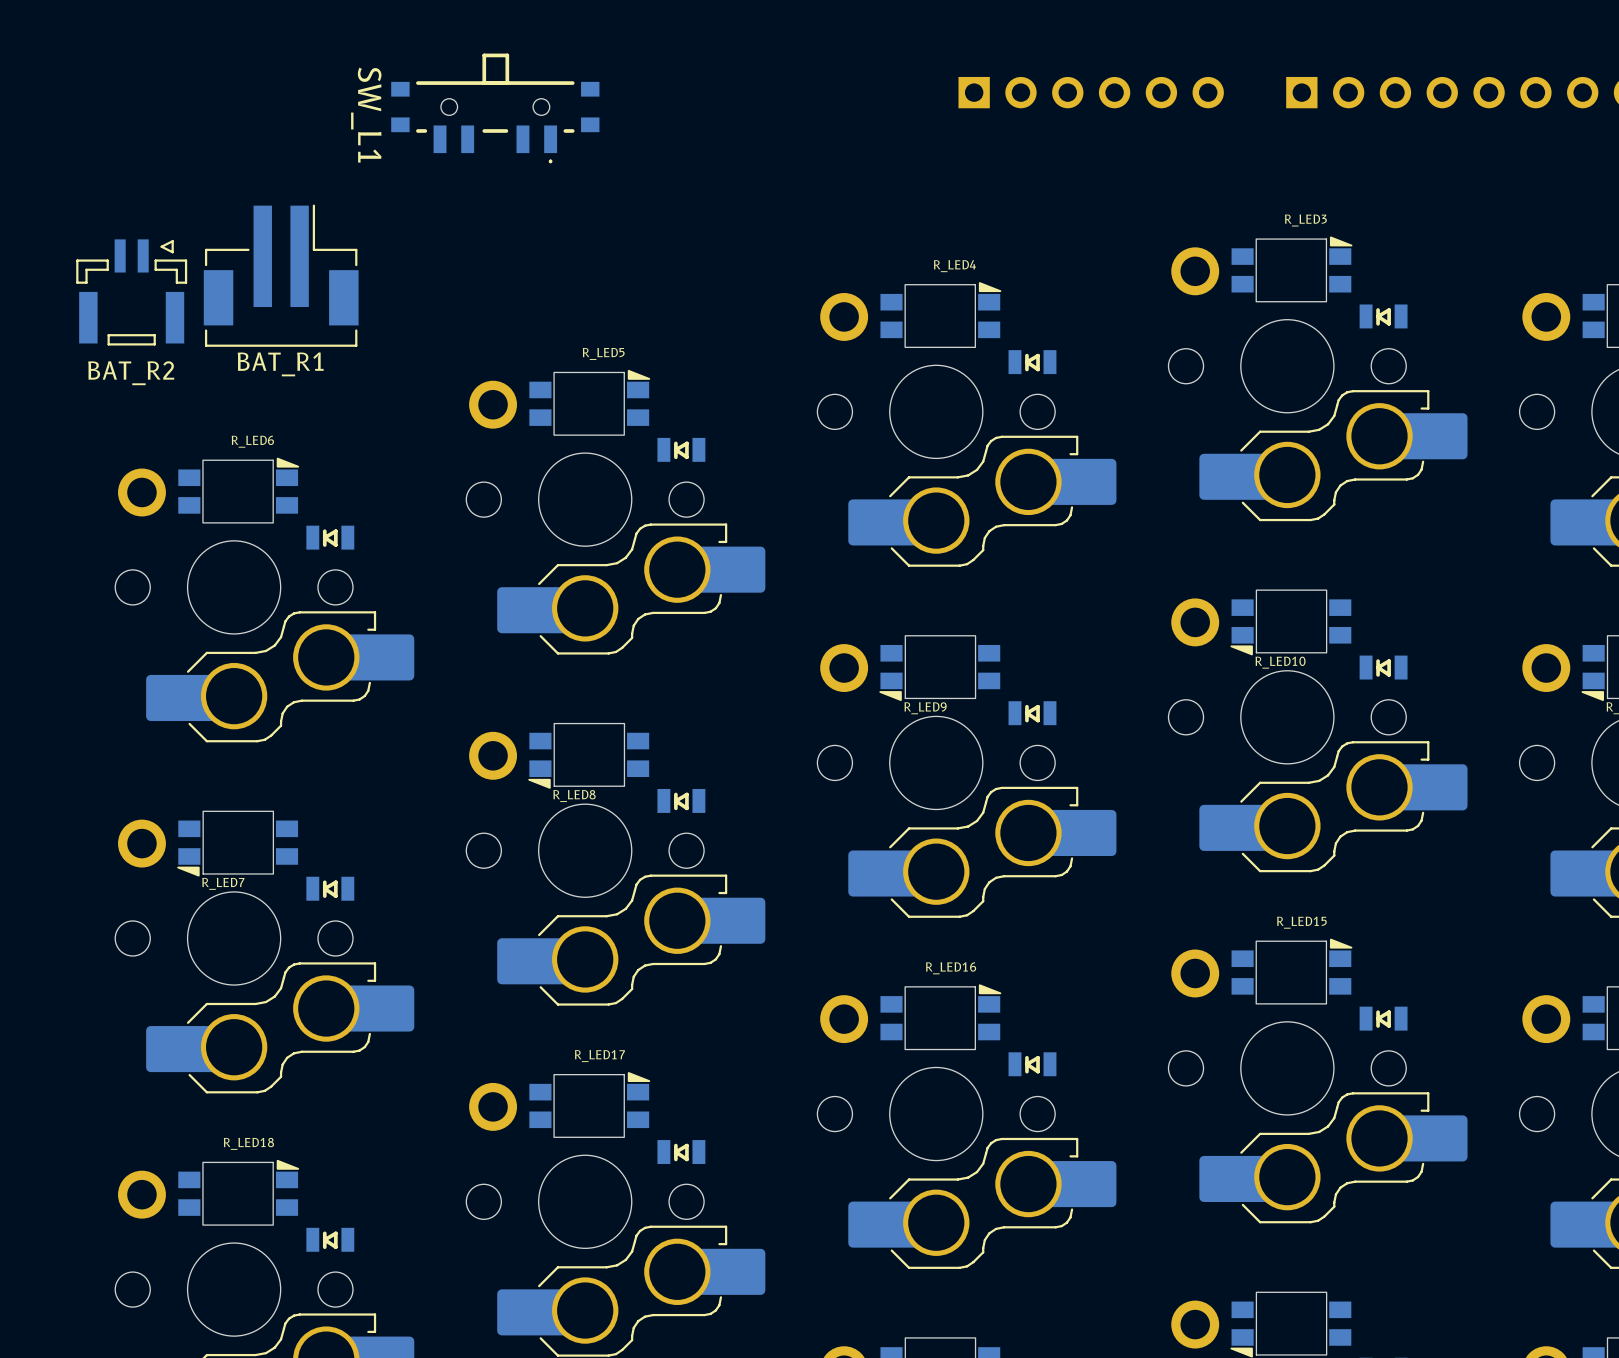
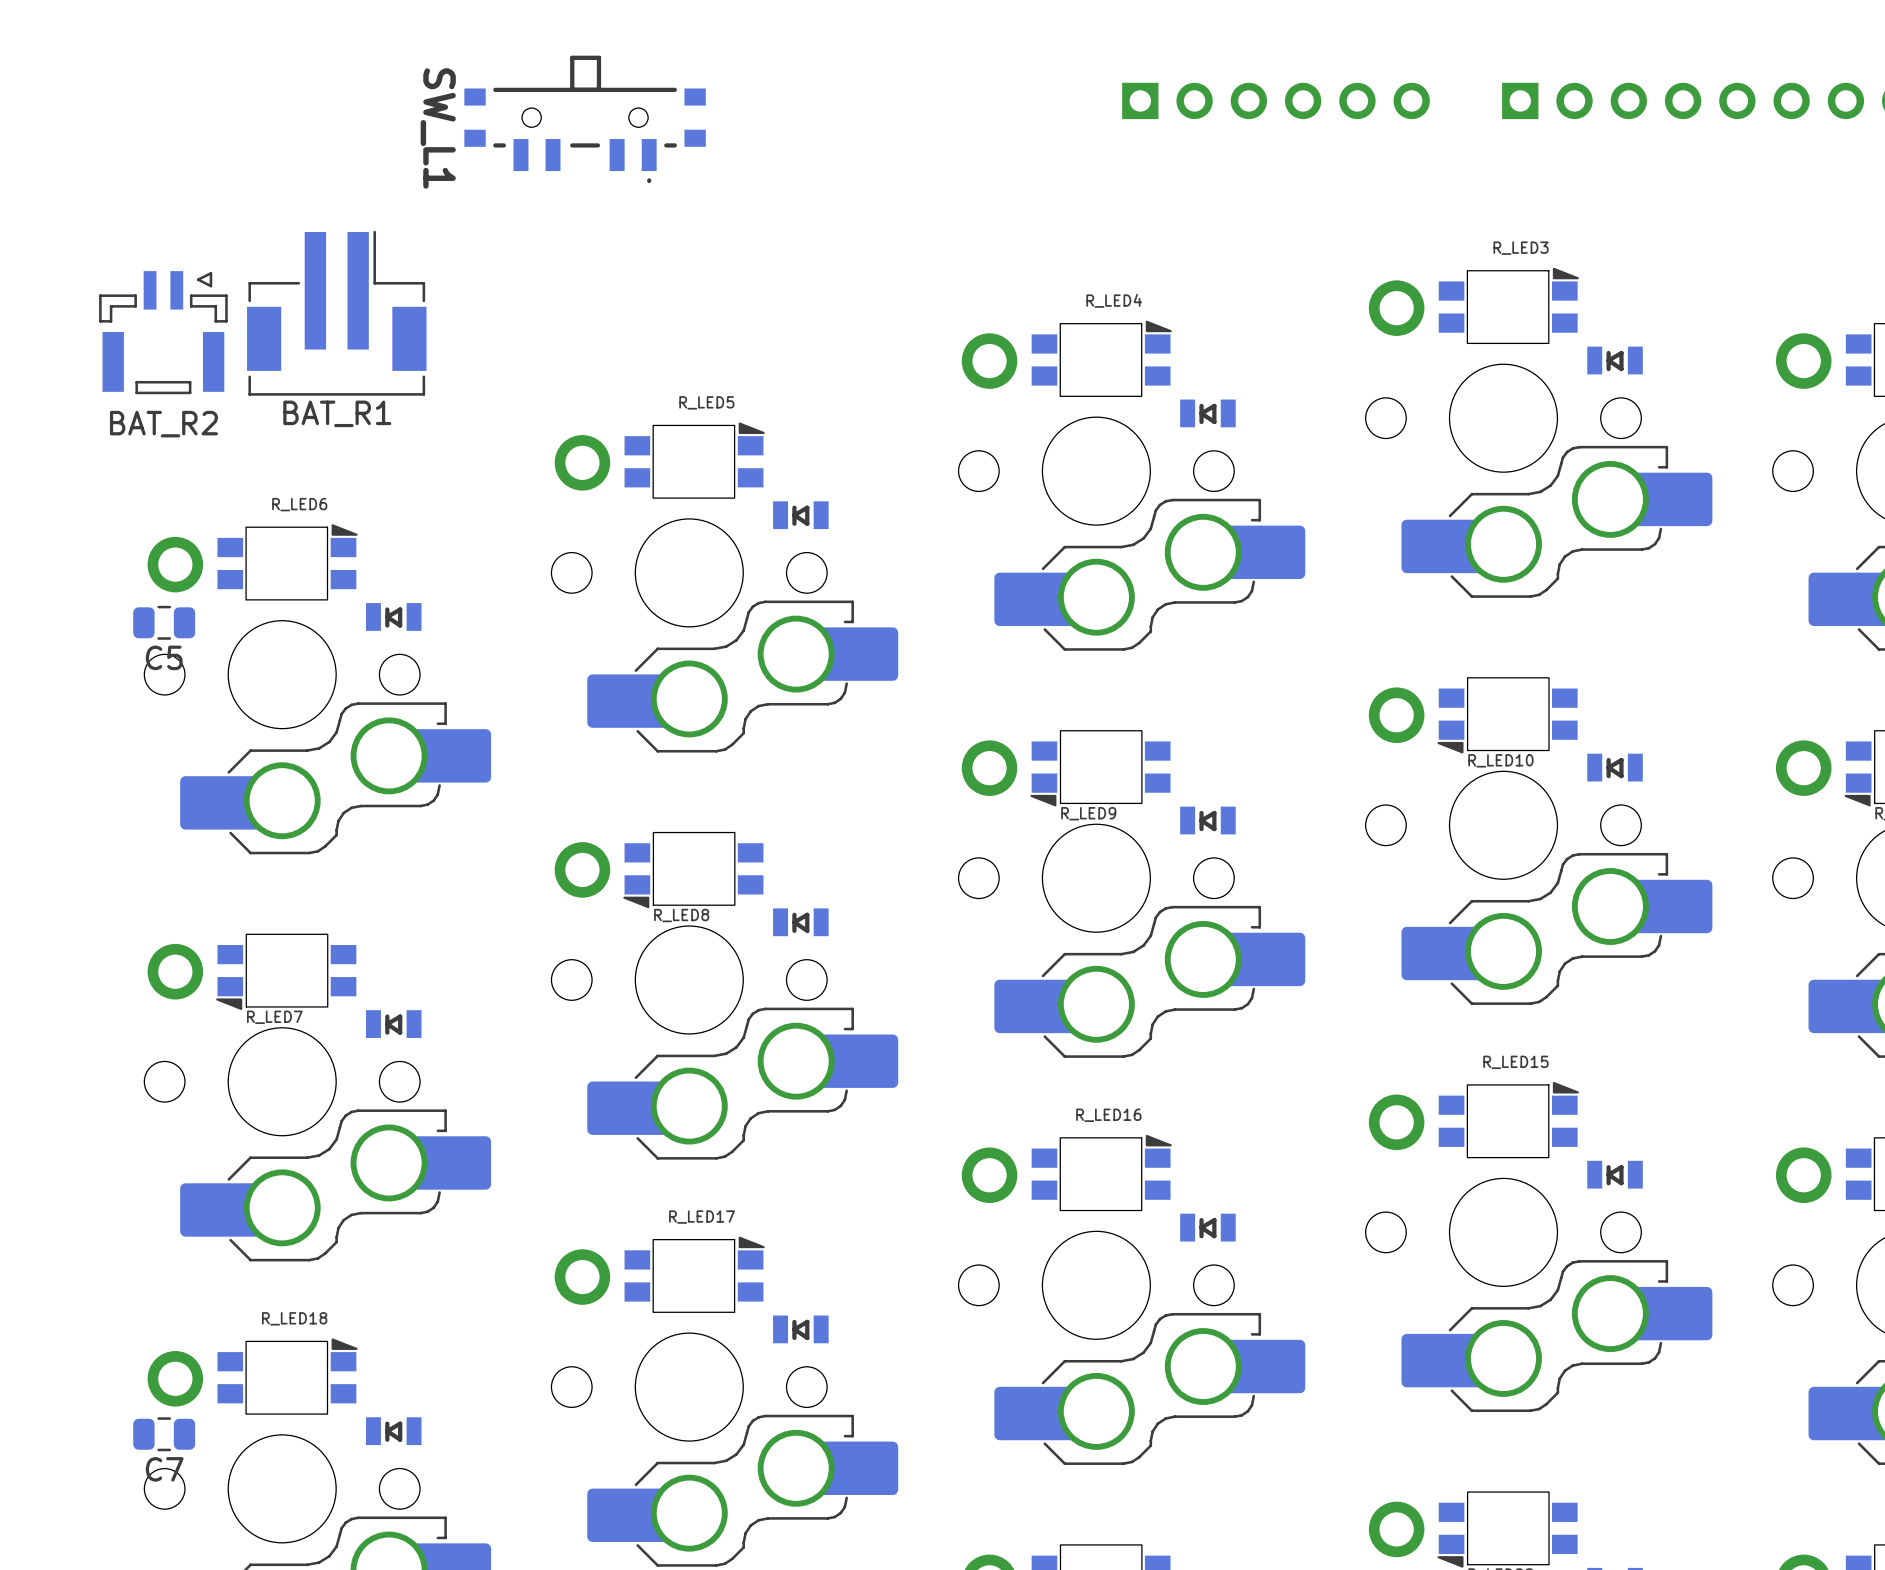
C5: none -> (164, 622)
C7: none -> (164, 1434)

